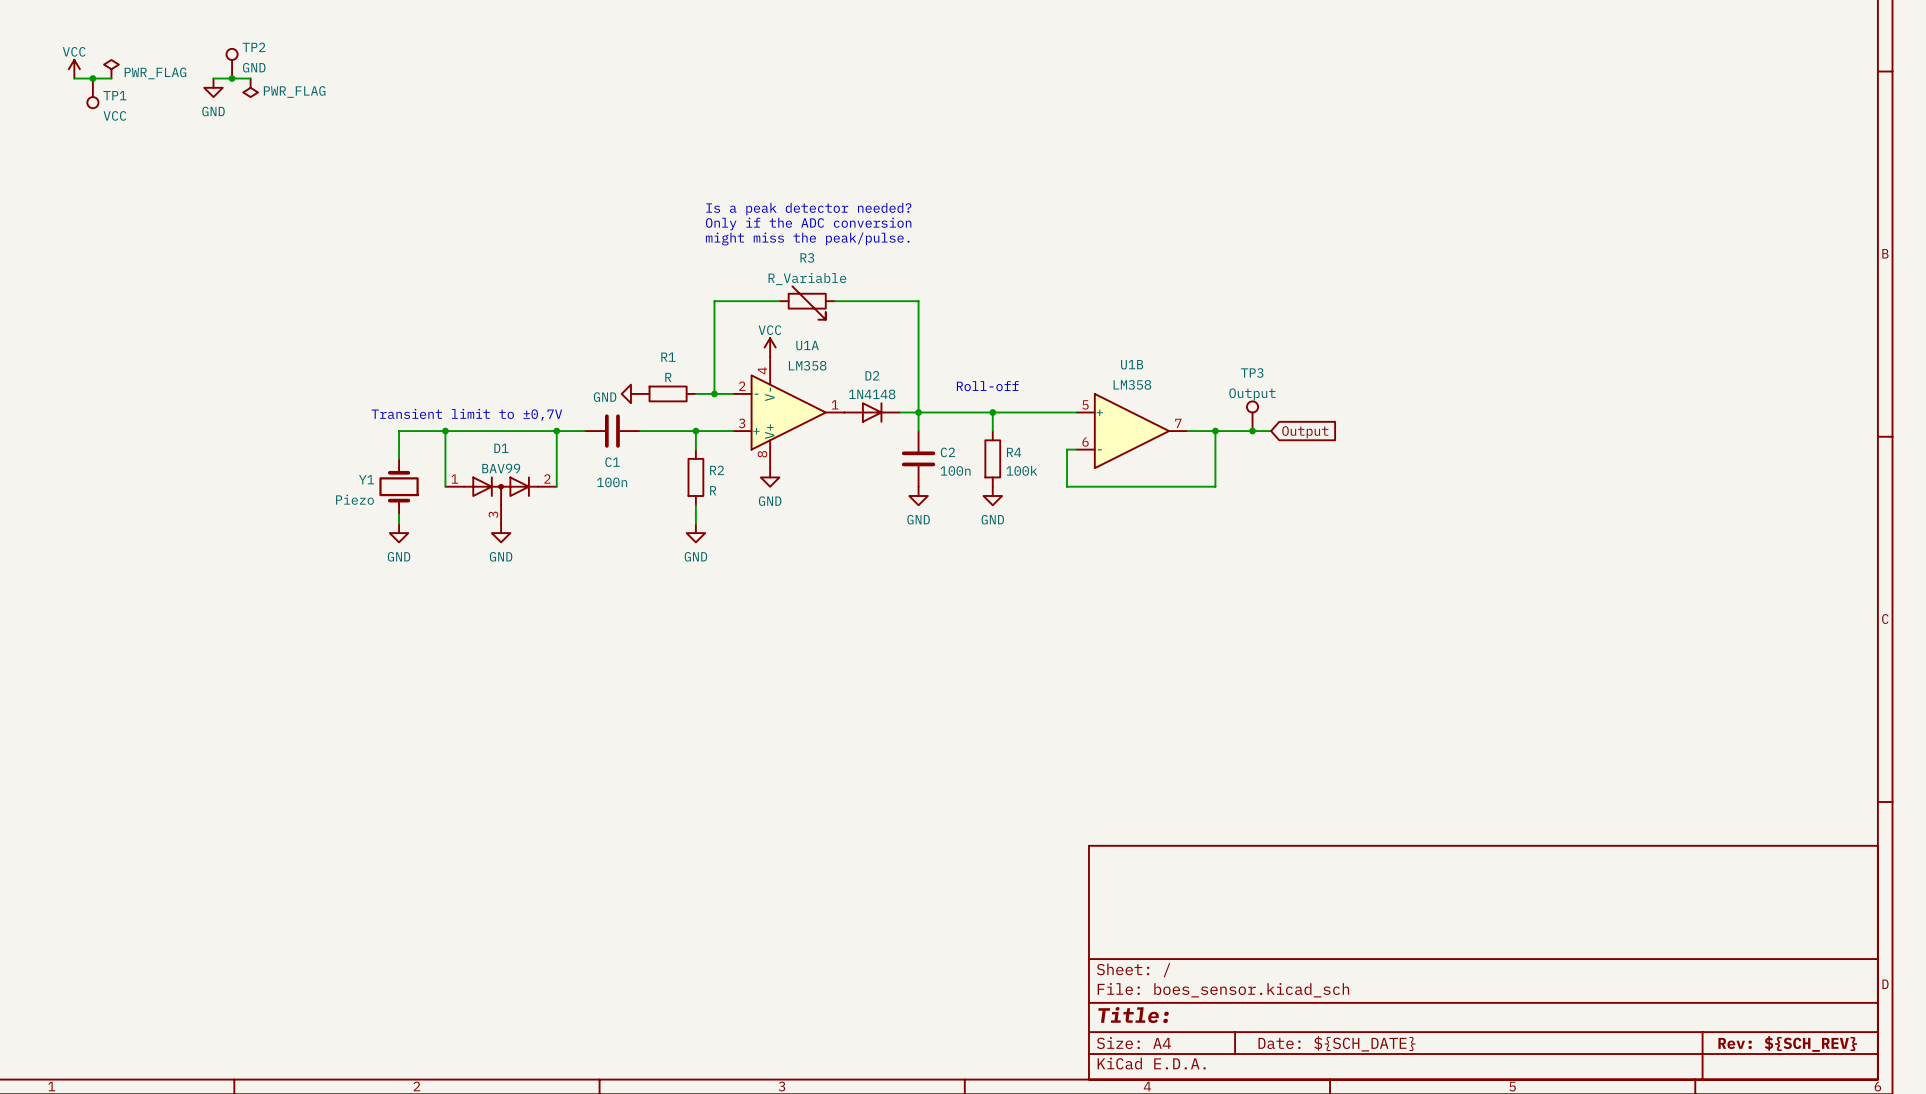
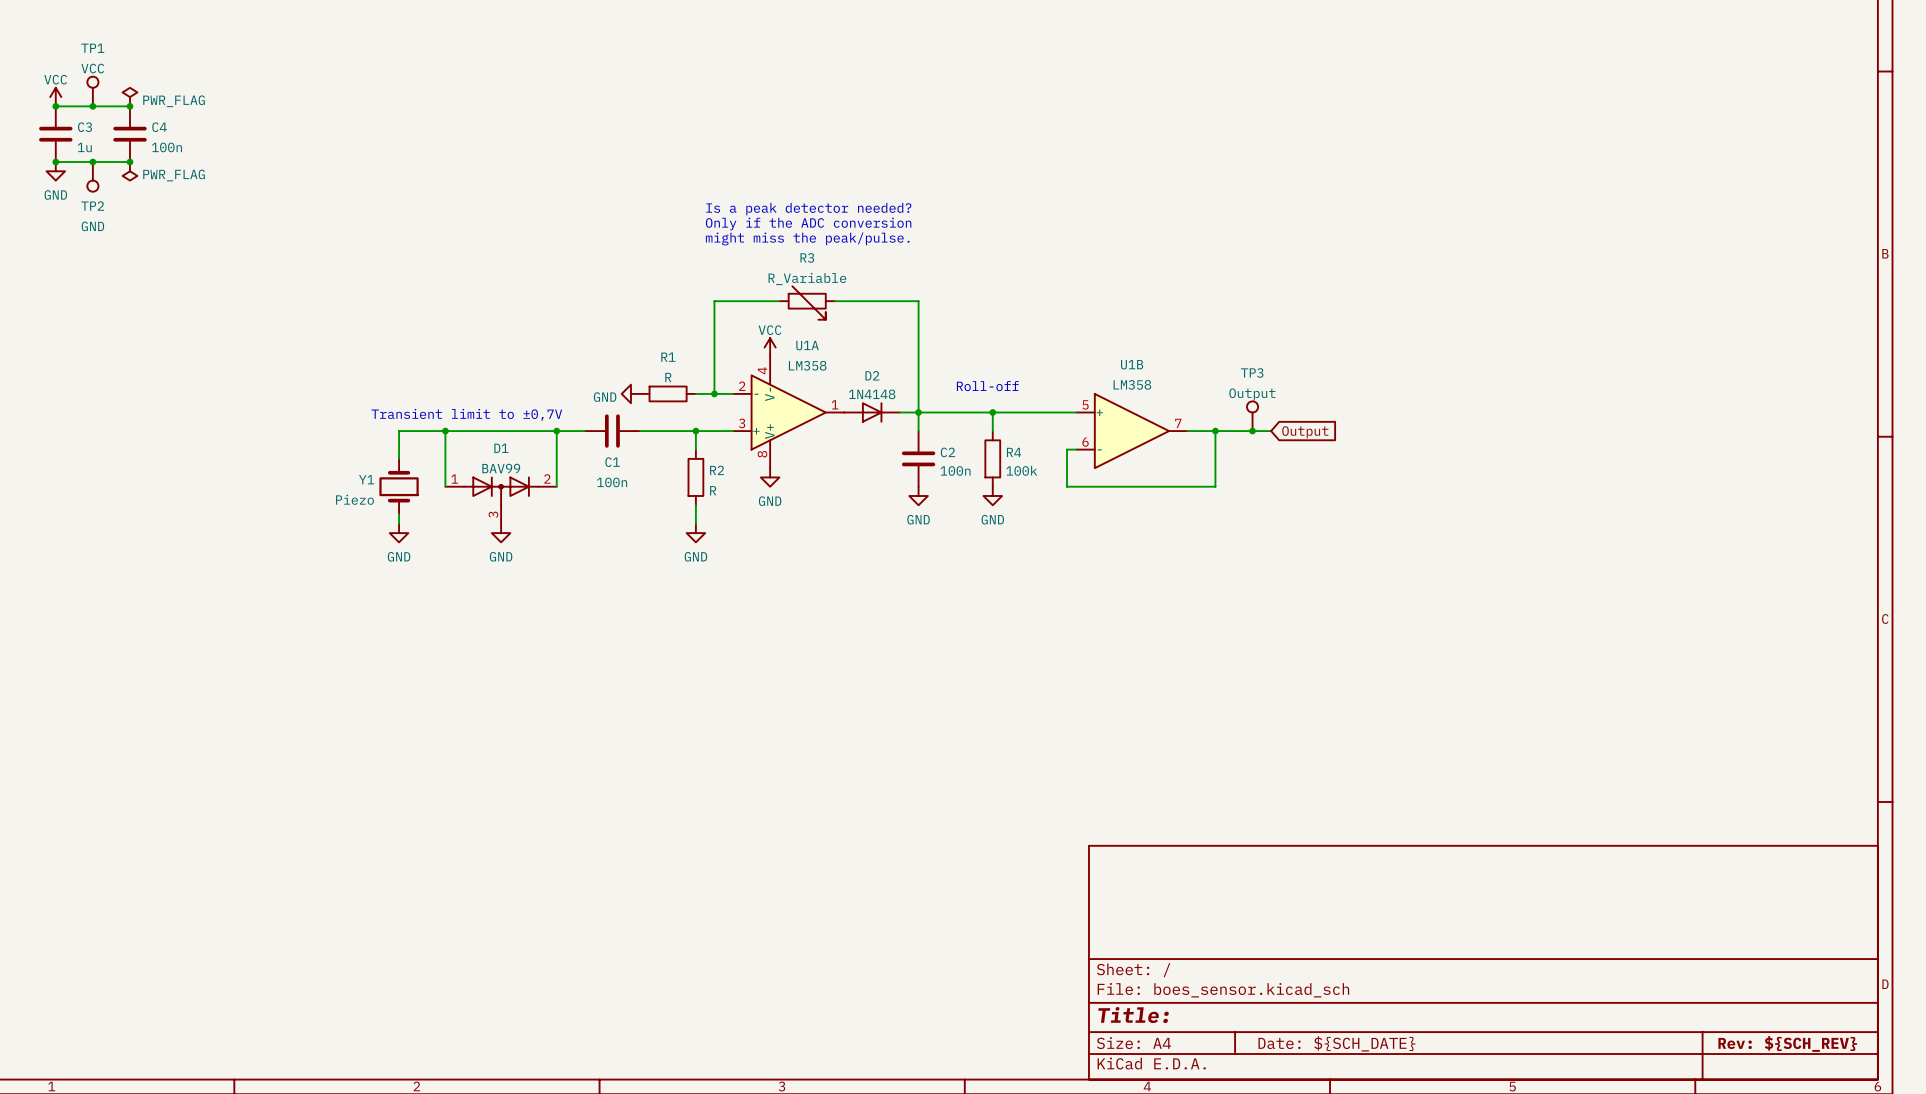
TP2 name position: TP2 (253, 47) -> TP2 (92, 206)
TP2 rotation: 0° (232, 54) -> 180° (92, 186)
TP2 position: (232, 63) -> (92, 176)
TP2 value position: GND (254, 67) -> GND (92, 226)
power symbol position: VCC (74, 69) -> VCC (55, 97)
power symbol position: PWR_FLAG (111, 69) -> PWR_FLAG (130, 97)
wire: (74, 78) (111, 78) -> none
junction: (92, 78) -> none
wire: (213, 78) (250, 78) -> none
junction: (232, 78) -> none
power symbol position: GND (213, 87) -> GND (55, 171)
power symbol: PWR_FLAG (250, 87) -> none
TP1 name position: TP1 (114, 95) -> TP1 (92, 48)
TP1 rotation: 0° (92, 102) -> 180° (92, 82)
wire: none -> (55, 106) (130, 106)
junction: none -> (55, 106)
junction: none -> (92, 106)
junction: none -> (130, 106)
TP1 value position: VCC (114, 115) -> VCC (92, 68)
C3: none -> 1u (55, 134)
C4: none -> 100n (130, 134)
wire: none -> (55, 162) (130, 162)
junction: none -> (55, 162)
junction: none -> (92, 162)
junction: none -> (130, 162)
power symbol: none -> PWR_FLAG (130, 171)

